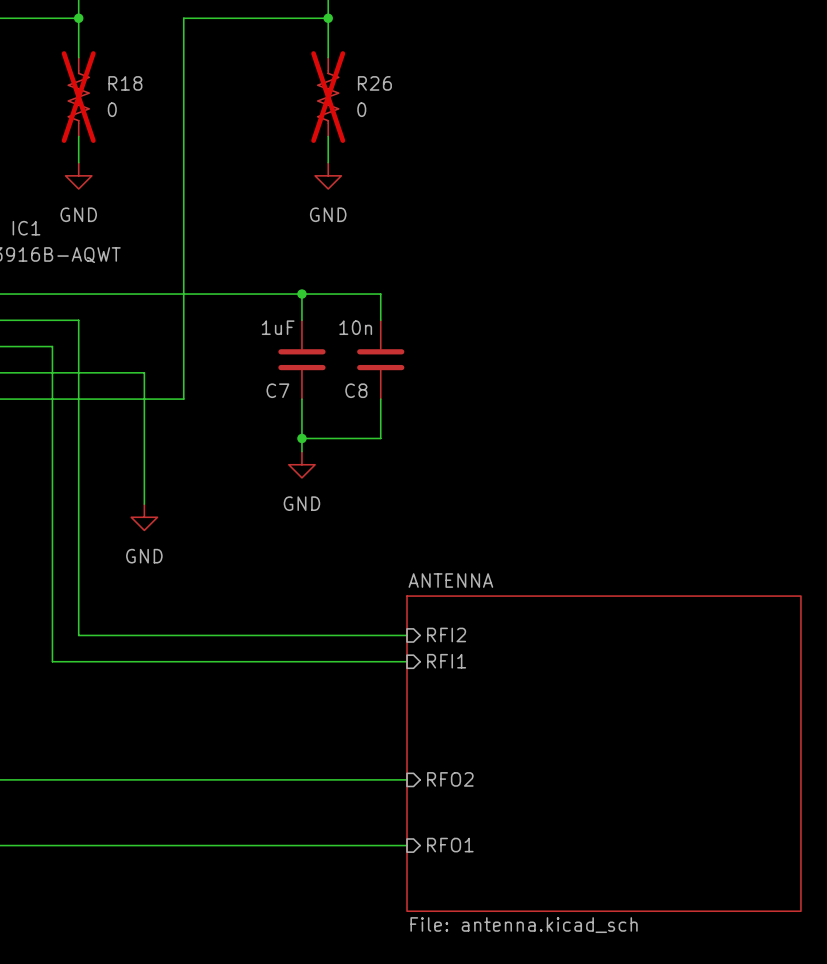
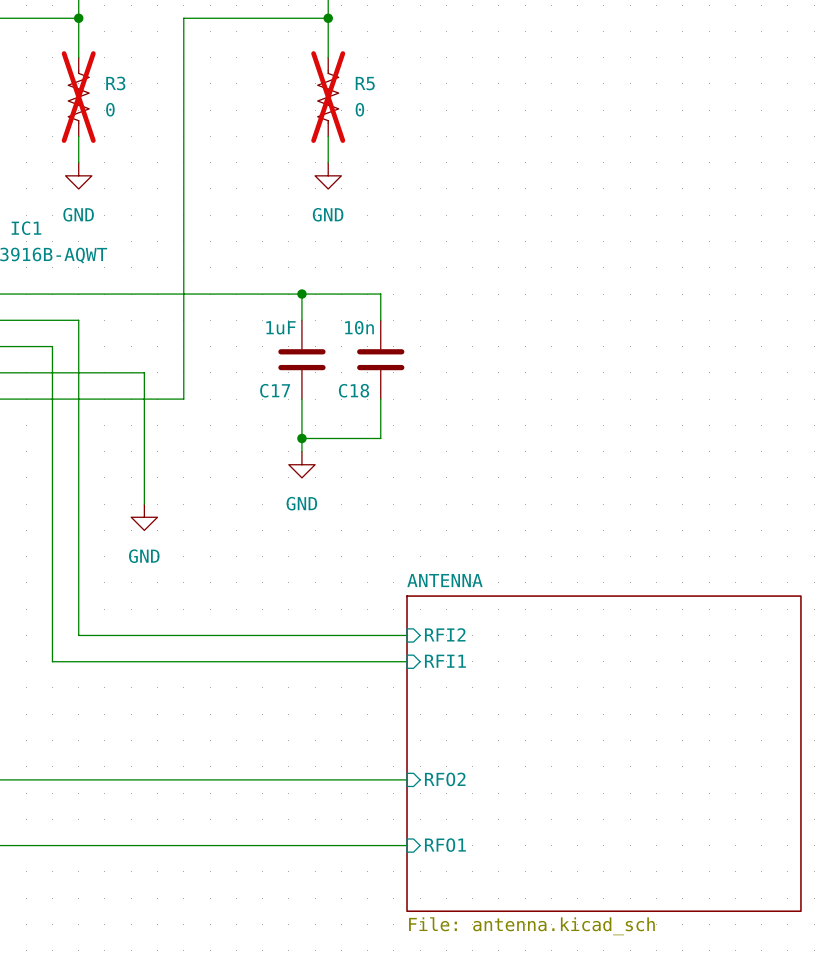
R18 name: R18 (125, 83) -> R3 (115, 83)
R26 name: R26 (374, 83) -> R5 (365, 83)
C7 name: C7 (277, 390) -> C17 (275, 390)
C8 name: C8 (356, 390) -> C18 (354, 390)

